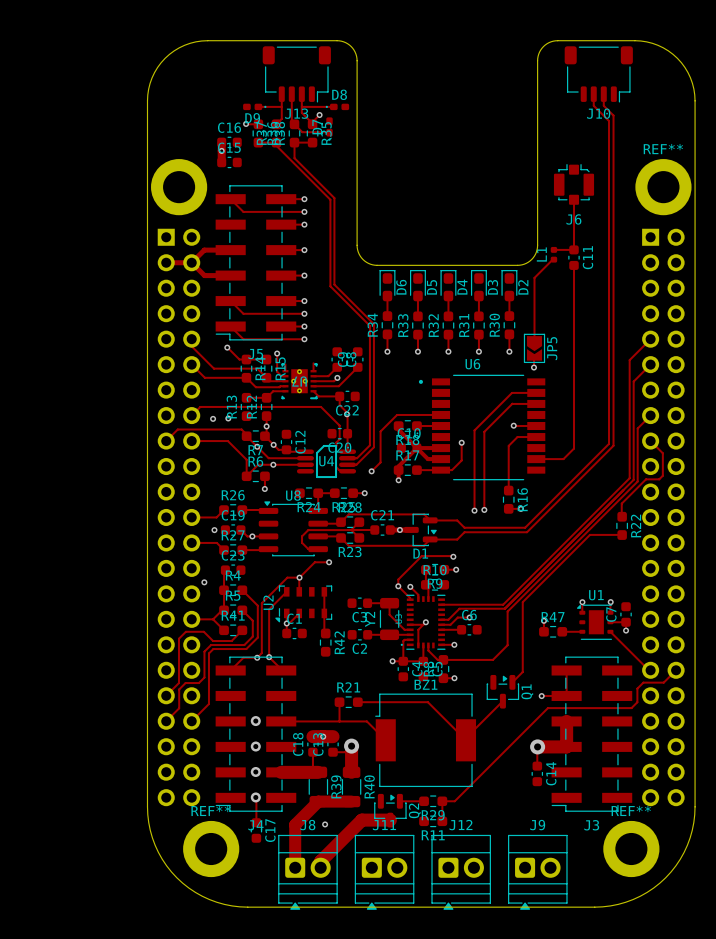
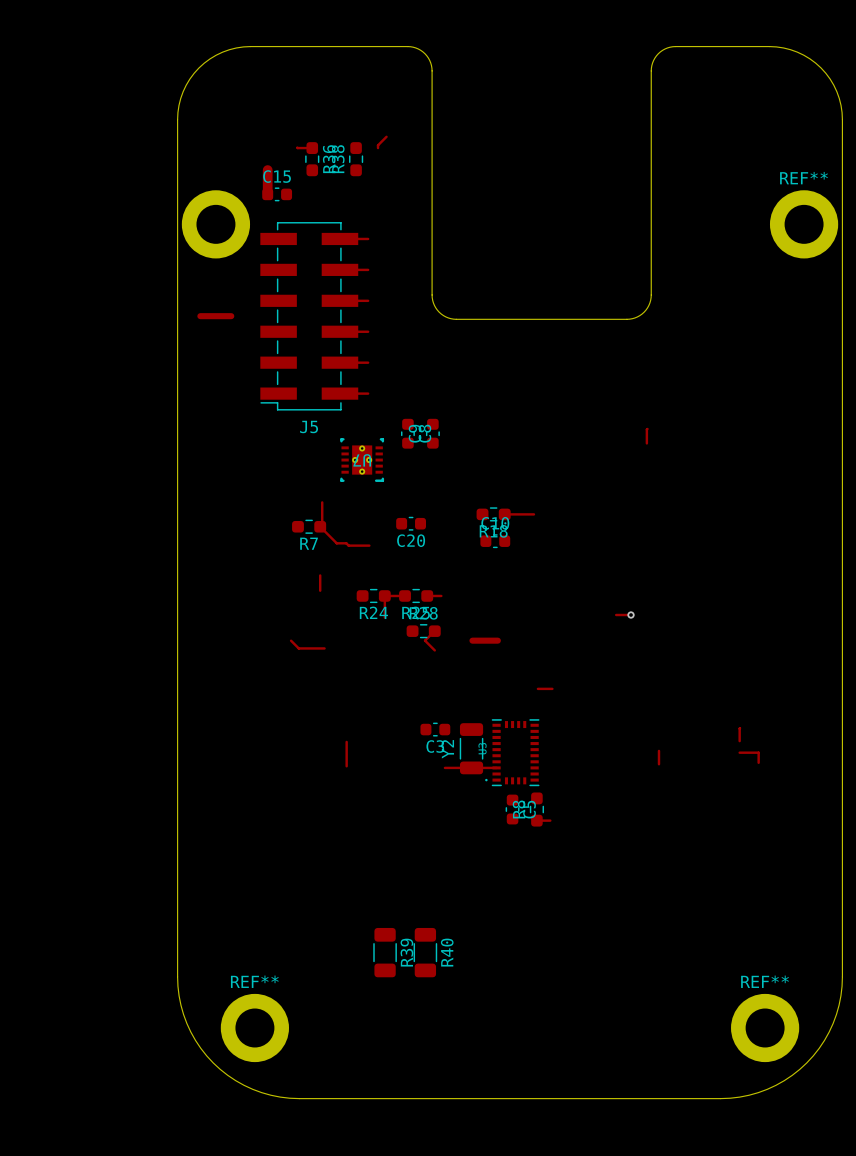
J13: (296, 74) -> none
J10: (598, 74) -> none
track: (281, 94) (281, 118) (276, 124) -> none
track: (291, 94) (291, 121) (302, 132) (329, 132) -> none
track: (301, 94) (301, 112) (312, 123) -> none
track: (593, 94) (593, 105) (609, 121) (609, 443) (525, 527) (464, 527) (457, 520) (430, 520) (424, 514) (348, 514) (339, 523) (318, 523) -> none
track: (603, 94) (603, 105) (613, 115) (613, 445) (527, 532) (464, 532) (457, 539) (430, 539) -> none
D9: (254, 106) -> none
track: (258, 106) (281, 106) -> none
track: (301, 106) (333, 106) -> none
D8: (337, 106) -> none
via: (319, 115) -> none
via: (246, 123) -> none
D7: (329, 129) -> none
R37: (276, 133) -> none
R35: (312, 133) -> none
C16: (229, 142) -> none
track: (258, 142) (276, 142) (276, 145) (330, 199) (330, 286) (369, 325) (369, 445) (357, 458) (347, 458) -> none
track: (312, 142) (294, 142) (294, 158) (334, 198) (334, 284) (373, 324) (373, 447) (356, 464) (347, 464) -> none
via: (221, 150) -> none
J6: (574, 184) -> none
track: (230, 199) (243, 211) (304, 211) -> none
via: (304, 199) -> none
track: (574, 199) (574, 249) (553, 249) -> none
via: (304, 211) -> none
via: (304, 224) -> none
track: (230, 250) (204, 250) (191, 262) (204, 275) (230, 275) -> none
via: (304, 250) -> none
L1: (553, 254) -> none
C11: (574, 257) -> none
track: (553, 259) (534, 277) (534, 341) -> none
track: (574, 265) (574, 448) (563, 459) (536, 459) -> none
via: (304, 275) -> none
D6: (387, 285) -> none
D5: (417, 285) -> none
D4: (448, 285) -> none
D3: (478, 285) -> none
D2: (509, 285) -> none
track: (387, 296) (387, 316) -> none
track: (417, 296) (417, 316) -> none
track: (448, 296) (448, 316) -> none
track: (478, 296) (478, 316) -> none
track: (509, 296) (509, 316) -> none
track: (230, 301) (243, 313) (304, 313) -> none
via: (304, 301) -> none
via: (304, 313) -> none
R34: (387, 325) -> none
R33: (417, 325) -> none
R32: (448, 325) -> none
R31: (478, 325) -> none
R30: (509, 325) -> none
track: (230, 326) (243, 339) (304, 339) -> none
via: (304, 326) -> none
track: (387, 334) (387, 351) -> none
track: (417, 334) (417, 351) -> none
track: (448, 334) (448, 351) -> none
track: (478, 334) (478, 351) -> none
track: (509, 334) (509, 351) -> none
track: (191, 339) (191, 346) (213, 368) (257, 368) (269, 381) (285, 381) -> none
via: (304, 339) -> none
track: (650, 339) (629, 360) (629, 478) (503, 604) (441, 604) -> none
track: (227, 347) (239, 359) (266, 359) -> none
via: (227, 347) -> none
JP5: (534, 348) -> none
via: (387, 351) -> none
via: (417, 351) -> none
via: (448, 351) -> none
via: (478, 351) -> none
via: (509, 351) -> none
track: (277, 353) (277, 371) (281, 376) (285, 376) -> none
via: (277, 353) -> none
track: (313, 363) (313, 371) -> none
track: (191, 364) (204, 377) (246, 377) (255, 387) (285, 386) -> none
track: (285, 364) (285, 371) -> none
track: (650, 364) (633, 381) (633, 479) (504, 608) (459, 608) (448, 619) (441, 619) -> none
track: (337, 367) (328, 376) (313, 376) -> none
track: (357, 367) (338, 386) (313, 386) -> none
via: (533, 367) -> none
R14: (246, 368) -> none
R15: (266, 368) -> none
track: (337, 377) (334, 381) (313, 381) -> none
via: (337, 377) -> none
track: (285, 391) (273, 391) (266, 397) (246, 397) -> none
track: (313, 391) (318, 396) (339, 396) (339, 405) (347, 414) (347, 451) -> none
track: (536, 392) (512, 392) (474, 430) (474, 510) -> none
C22: (347, 396) -> none
track: (536, 403) (512, 403) (484, 431) (484, 509) -> none
R13: (246, 406) -> none
R12: (266, 406) -> none
via: (346, 414) -> none
track: (441, 414) (397, 414) (380, 431) (380, 462) (371, 471) -> none
track: (191, 415) (200, 406) (320, 406) (339, 425) (339, 439) (336, 446) (336, 466) (341, 471) (347, 471) -> none
track: (650, 415) (637, 428) (637, 481) (507, 611) (507, 645) (492, 659) (437, 659) (428, 650) (428, 645) -> none
via: (213, 418) -> none
via: (228, 418) -> none
track: (513, 425) (536, 426) -> none
via: (513, 425) -> none
via: (266, 426) -> none
track: (398, 426) (398, 429) (427, 459) (441, 459) -> none
U6: (482, 427) -> none
track: (246, 436) (268, 458) (305, 458) -> none
track: (248, 436) (241, 429) (177, 429) (166, 441) -> none
track: (536, 437) (517, 437) (508, 445) (508, 490) -> none
track: (191, 441) (227, 441) (246, 459) (246, 476) (258, 464) (305, 464) -> none
track: (650, 441) (662, 453) (662, 475) (659, 479) (646, 479) (621, 503) (622, 516) -> none
C12: (286, 442) -> none
track: (461, 442) (461, 460) (452, 470) (416, 470) -> none
via: (461, 442) -> none
via: (273, 444) -> none
via: (257, 446) -> none
track: (441, 448) (416, 448) (398, 466) (398, 480) -> none
U4: (326, 461) -> none
via: (273, 464) -> none
R17: (407, 470) -> none
via: (371, 471) -> none
R6: (255, 476) -> none
via: (398, 480) -> none
via: (264, 488) -> none
via: (364, 493) -> none
R16: (508, 499) -> none
track: (224, 509) (216, 517) (191, 517) -> none
R26: (233, 509) -> none
track: (242, 509) (268, 510) -> none
via: (484, 509) -> none
via: (474, 510) -> none
part: (178, 517) -> none
part: (663, 517) -> none
R22: (622, 525) -> none
U8: (293, 528) -> none
D1: (420, 529) -> none
via: (214, 530) -> none
C19: (233, 530) -> none
track: (348, 530) (374, 530) -> none
track: (351, 530) (308, 530) (302, 536) (302, 542) (308, 549) (318, 549) -> none
C21: (382, 530) -> none
via: (399, 530) -> none
track: (622, 534) (589, 534) (522, 602) (522, 672) (512, 682) -> none
via: (252, 536) -> none
track: (318, 536) (339, 536) (348, 545) (423, 545) (430, 539) -> none
R23: (350, 538) -> none
track: (191, 542) (216, 542) (224, 550) -> none
track: (268, 549) (242, 550) -> none
R27: (233, 550) -> none
track: (453, 556) (421, 556) (398, 579) (398, 586) (410, 599) -> none
via: (453, 556) -> none
track: (329, 562) (314, 562) (299, 577) (299, 591) -> none
via: (329, 562) -> none
R9: (435, 569) -> none
via: (456, 569) -> none
track: (225, 570) (224, 610) (213, 619) -> none
C23: (233, 570) -> none
track: (425, 573) (428, 599) -> none
track: (299, 577) (287, 577) (261, 603) (261, 653) (257, 657) (243, 657) (230, 670) -> none
via: (299, 577) -> none
via: (204, 582) -> none
R10: (435, 584) -> none
via: (398, 586) -> none
track: (410, 586) (418, 594) (418, 599) -> none
via: (410, 586) -> none
R4: (233, 590) -> none
track: (242, 590) (257, 605) (257, 637) (246, 649) (213, 649) (208, 653) (208, 703) (191, 721) -> none
track: (286, 591) (269, 609) (269, 657) (281, 670) -> none
track: (324, 591) (325, 633) -> none
track: (582, 602) (582, 612) -> none
via: (582, 602) -> none
via: (610, 602) -> none
U2: (303, 603) -> none
track: (367, 603) (389, 603) (389, 614) (404, 629) (410, 629) -> none
R5: (233, 610) -> none
track: (242, 610) (252, 620) (252, 636) (244, 645) (211, 645) (204, 651) (204, 677) (198, 683) (185, 683) (179, 689) (179, 708) (166, 721) -> none
track: (299, 613) (289, 623) (286, 623) -> none
C7: (626, 614) -> none
track: (469, 617) (457, 617) (450, 624) (441, 624) -> none
via: (469, 617) -> none
track: (191, 619) (213, 619) -> none
track: (213, 619) (224, 630) -> none
via: (543, 620) -> none
track: (425, 622) (418, 629) (418, 645) -> none
via: (425, 622) -> none
U1: (595, 622) -> none
via: (286, 623) -> none
track: (410, 624) (423, 624) -> none
track: (441, 629) (461, 629) -> none
C6: (469, 629) -> none
R41: (233, 630) -> none
track: (242, 630) (231, 641) (213, 641) (203, 631) (185, 631) (178, 638) (178, 683) (166, 695) -> none
via: (626, 630) -> none
R47: (553, 631) -> none
track: (562, 631) (582, 631) -> none
track: (610, 631) (650, 670) -> none
C1: (294, 633) -> none
C2: (359, 634) -> none
track: (410, 639) (403, 641) (403, 661) -> none
R42: (325, 642) -> none
track: (441, 644) (454, 644) -> none
via: (454, 644) -> none
track: (423, 645) (423, 661) (392, 661) -> none
via: (257, 657) -> none
via: (269, 657) -> none
via: (392, 661) -> none
C4: (403, 669) -> none
track: (566, 670) (566, 695) (541, 695) -> none
track: (676, 670) (663, 682) (643, 682) (637, 688) (637, 702) (631, 708) (547, 708) (454, 801) (442, 801) (442, 821) -> none
via: (454, 678) -> none
Q1: (502, 691) -> none
via: (541, 696) -> none
track: (502, 701) (466, 738) (466, 740) (427, 702) (357, 702) -> none
track: (339, 702) (339, 721) -> none
R21: (348, 702) -> none
via: (255, 721) -> none
track: (281, 721) (366, 721) (385, 740) -> none
track: (566, 721) (566, 746) (537, 746) (537, 766) -> none
J4: (255, 734) -> none
J3: (591, 734) -> none
track: (312, 736) (333, 736) -> none
via: (323, 736) -> none
BZ1: (425, 740) -> none
C18: (312, 744) -> none
C13: (333, 744) -> none
via: (255, 746) -> none
via: (351, 746) -> none
via: (537, 746) -> none
track: (312, 752) (312, 767) (318, 772) (281, 772) -> none
track: (333, 752) (345, 752) (351, 746) (351, 772) -> none
via: (255, 771) -> none
C14: (537, 773) -> none
track: (255, 797) (256, 822) -> none
via: (255, 797) -> none
track: (351, 801) (318, 801) (295, 824) (295, 867) -> none
track: (399, 801) (424, 801) -> none
R29: (433, 801) -> none
Q2: (390, 810) -> none
track: (390, 820) (361, 820) (320, 861) (320, 867) -> none
R11: (433, 821) -> none
via: (325, 824) -> none
C17: (256, 830) -> none
J8: (307, 872) -> none
J11: (384, 872) -> none
J12: (461, 872) -> none
J9: (537, 872) -> none

